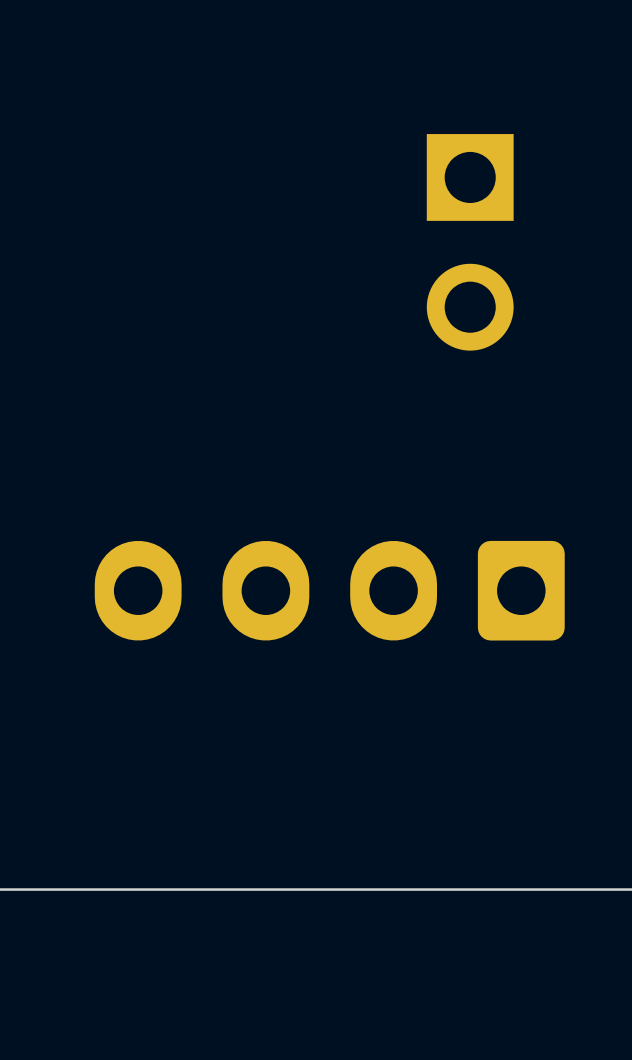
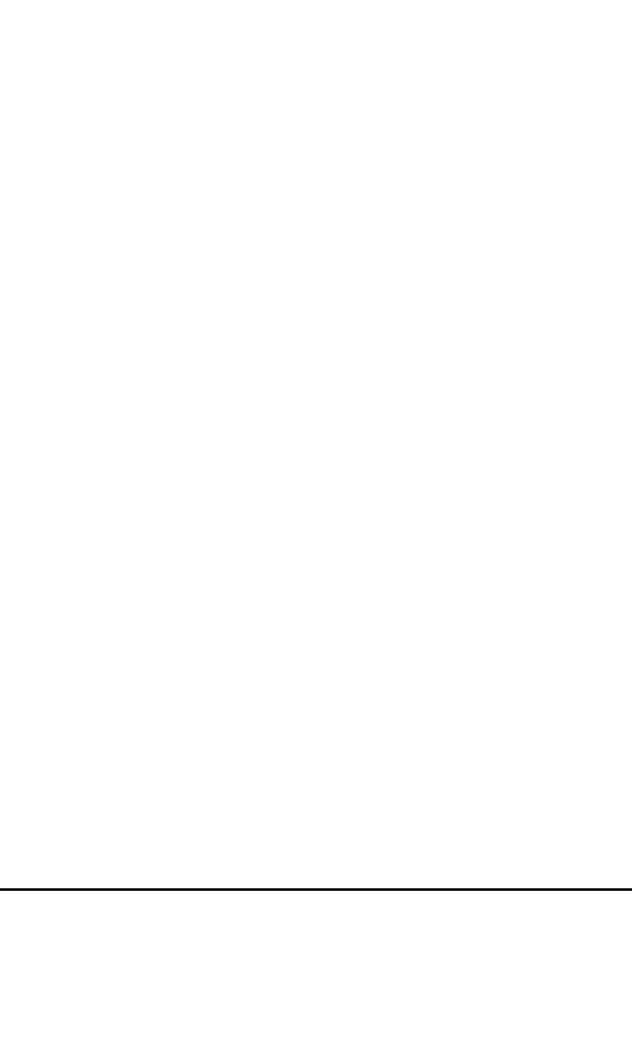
part: (470, 242) -> none
part: (329, 590) -> none

